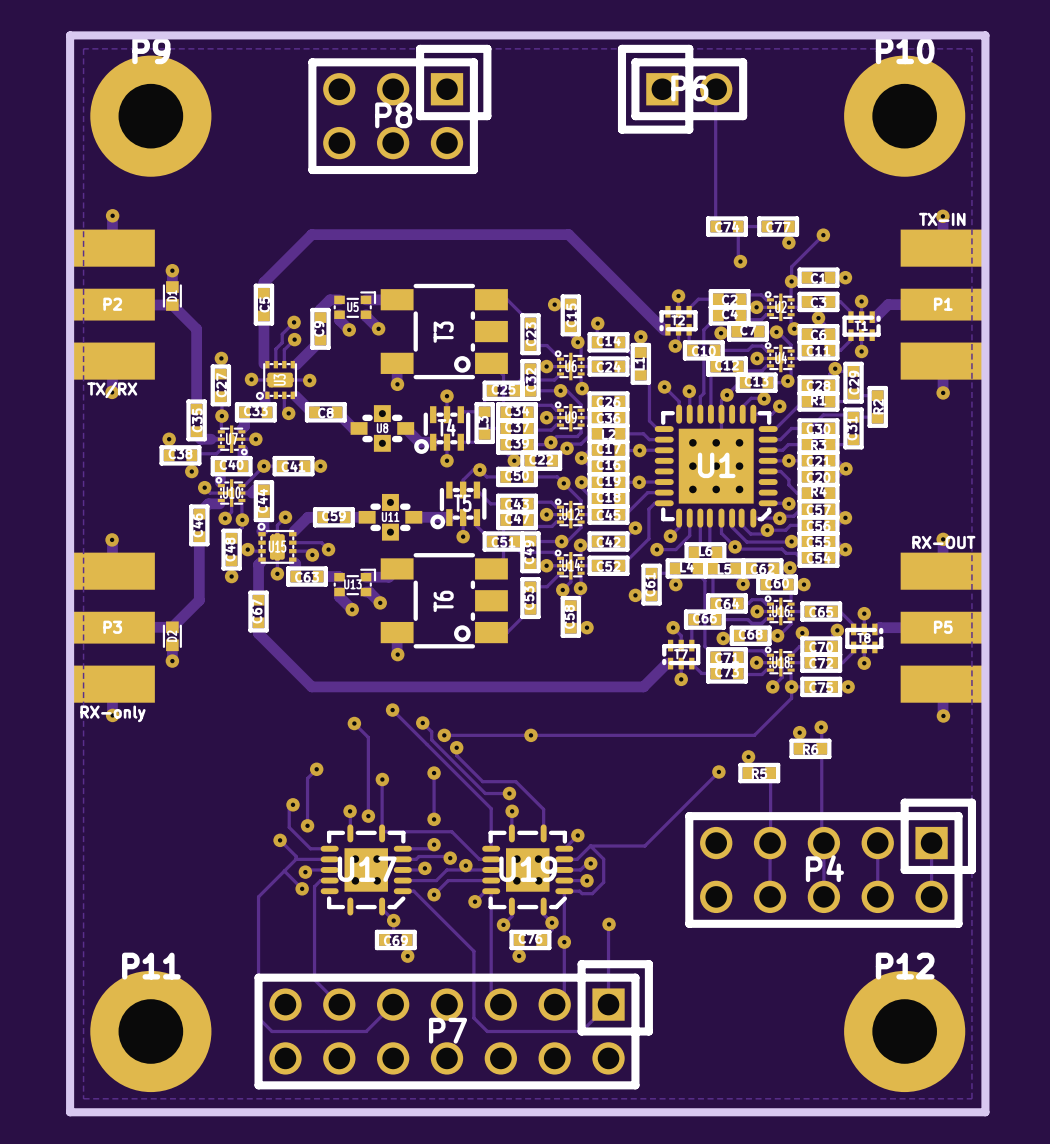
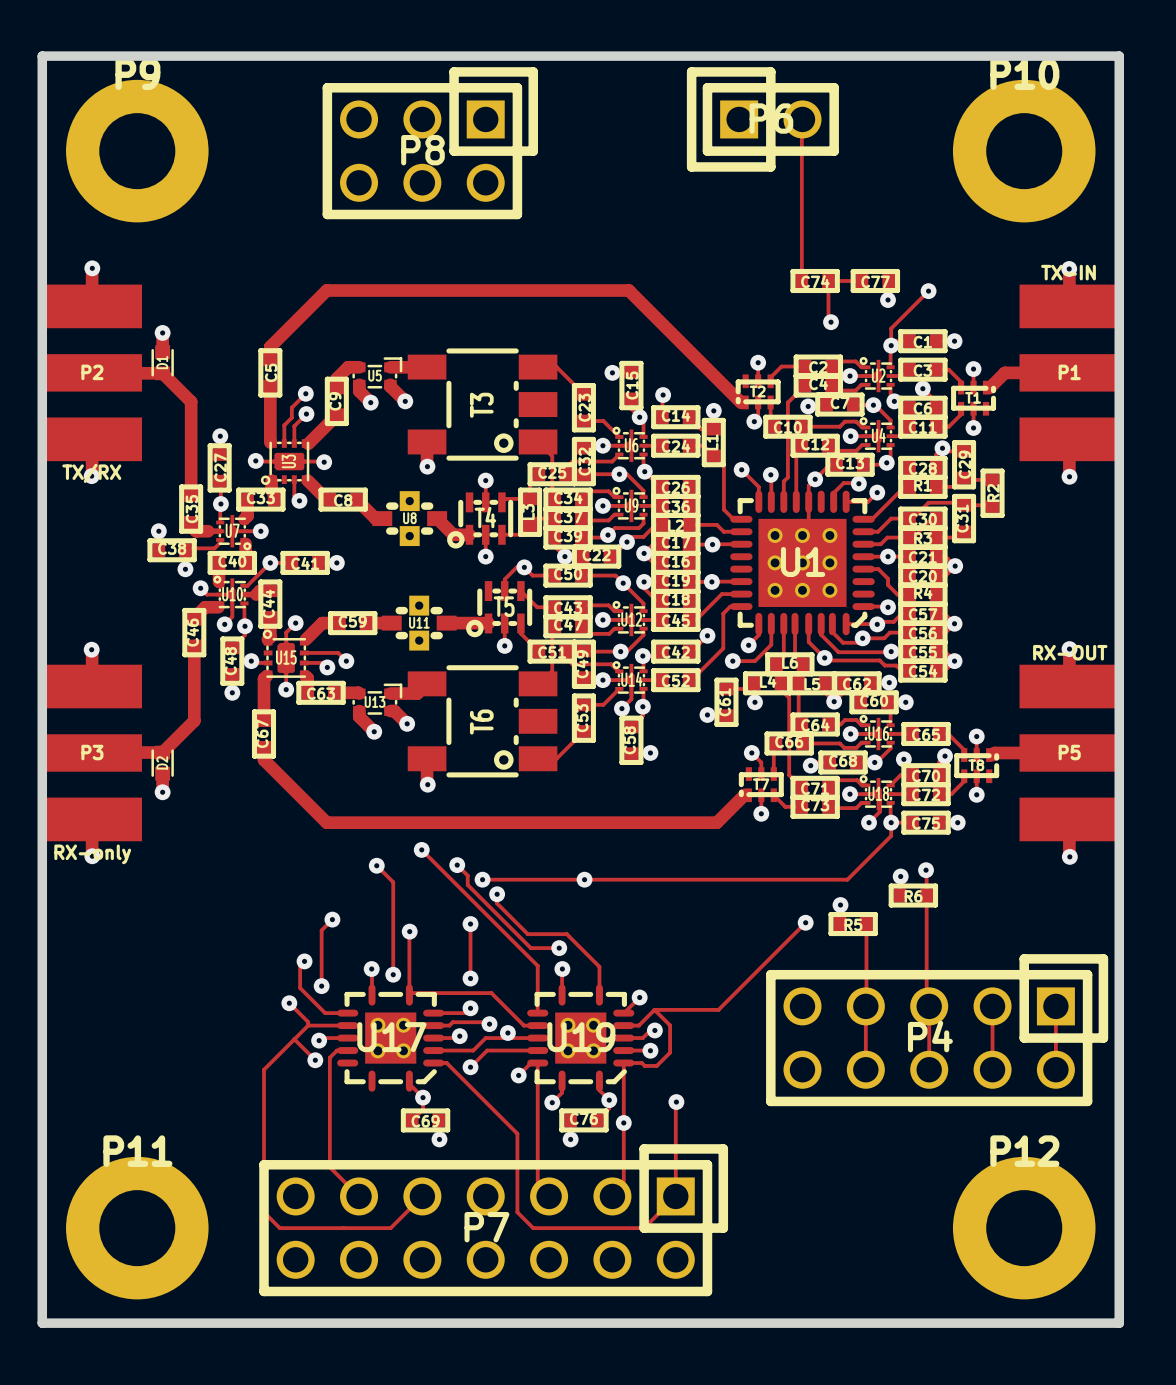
zone outline: (83, 48) (971, 48) (971, 1098) (83, 1098) (83, 48) -> none

